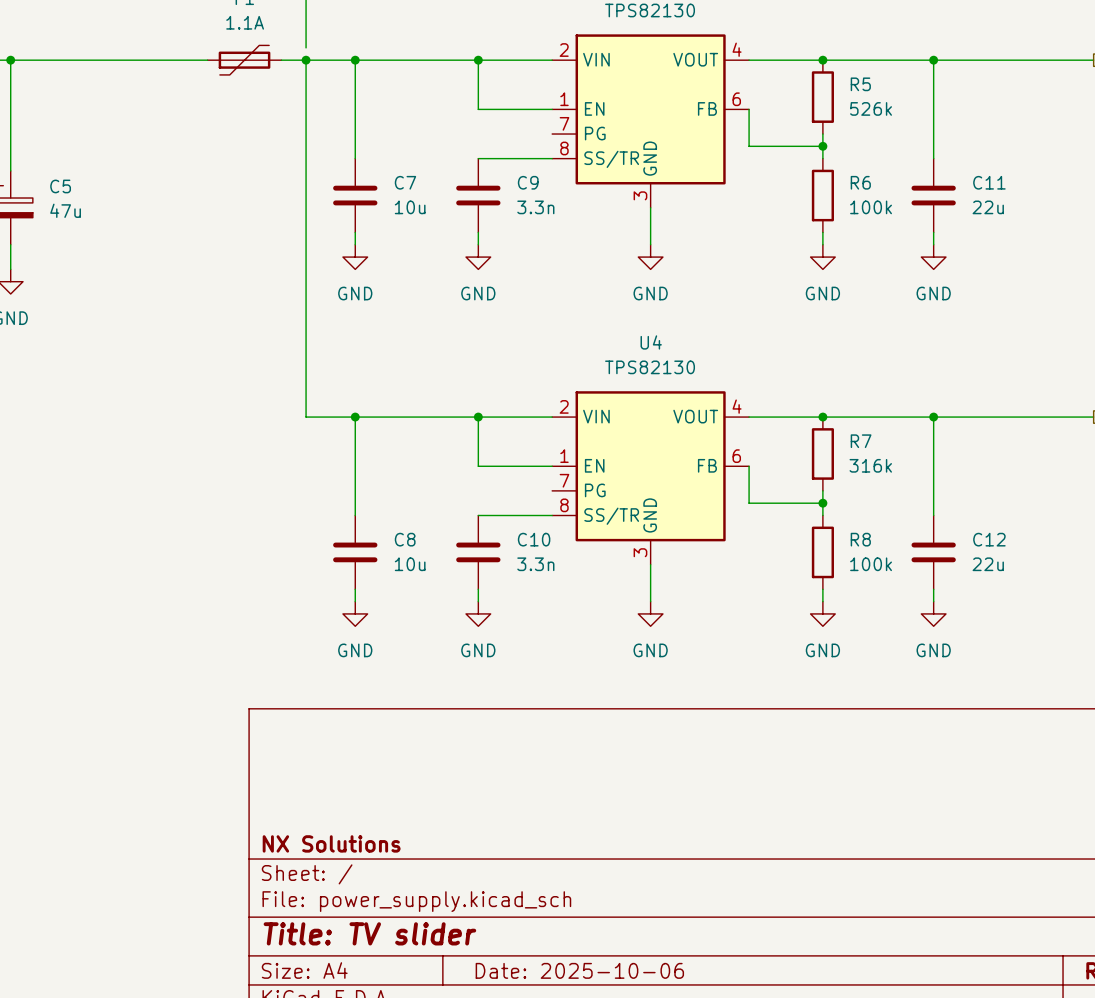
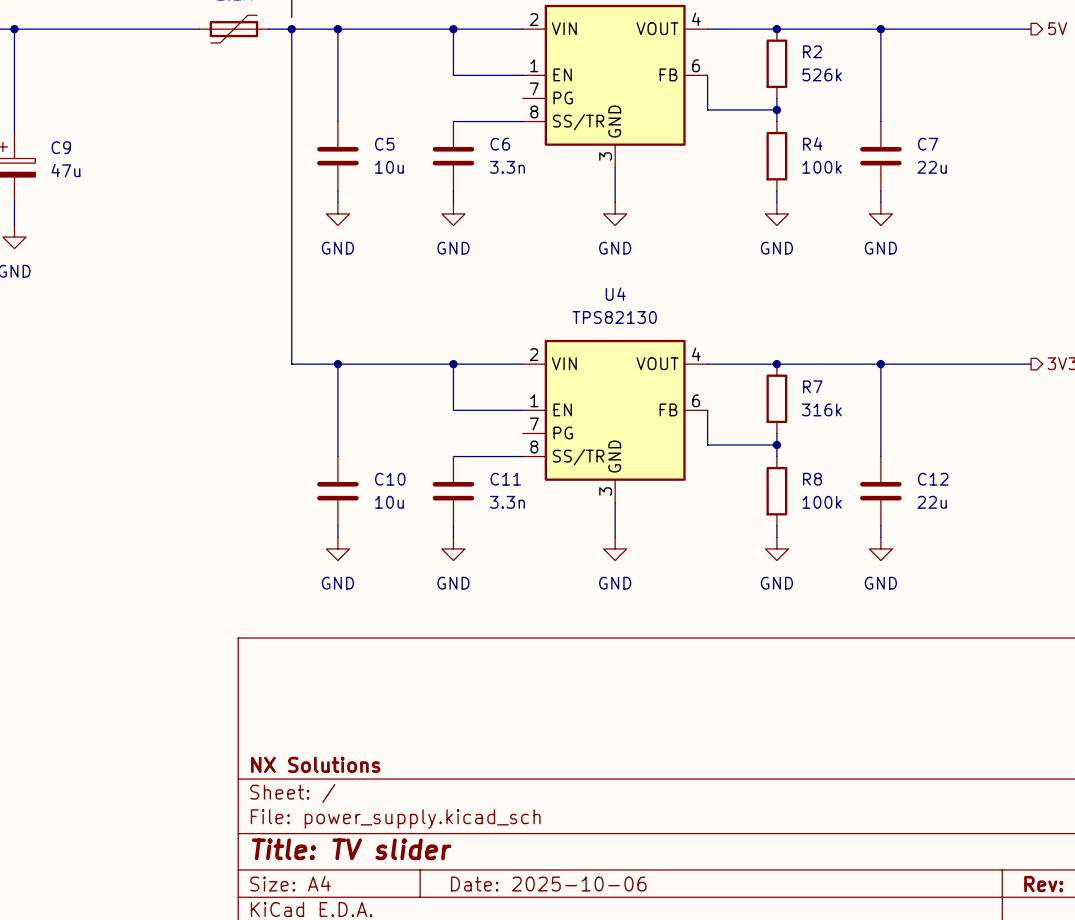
R5 name: R5 (860, 84) -> R2 (812, 51)
C7 name: C7 (405, 182) -> C5 (384, 144)
C9 name: C9 (528, 182) -> C6 (500, 144)
R6 name: R6 (860, 182) -> R4 (812, 143)
C11 name: C11 (989, 182) -> C7 (928, 144)
C5 name: C5 (60, 186) -> C9 (61, 147)
C8 name: C8 (405, 539) -> C10 (390, 479)
C10 name: C10 (534, 539) -> C11 (505, 479)

